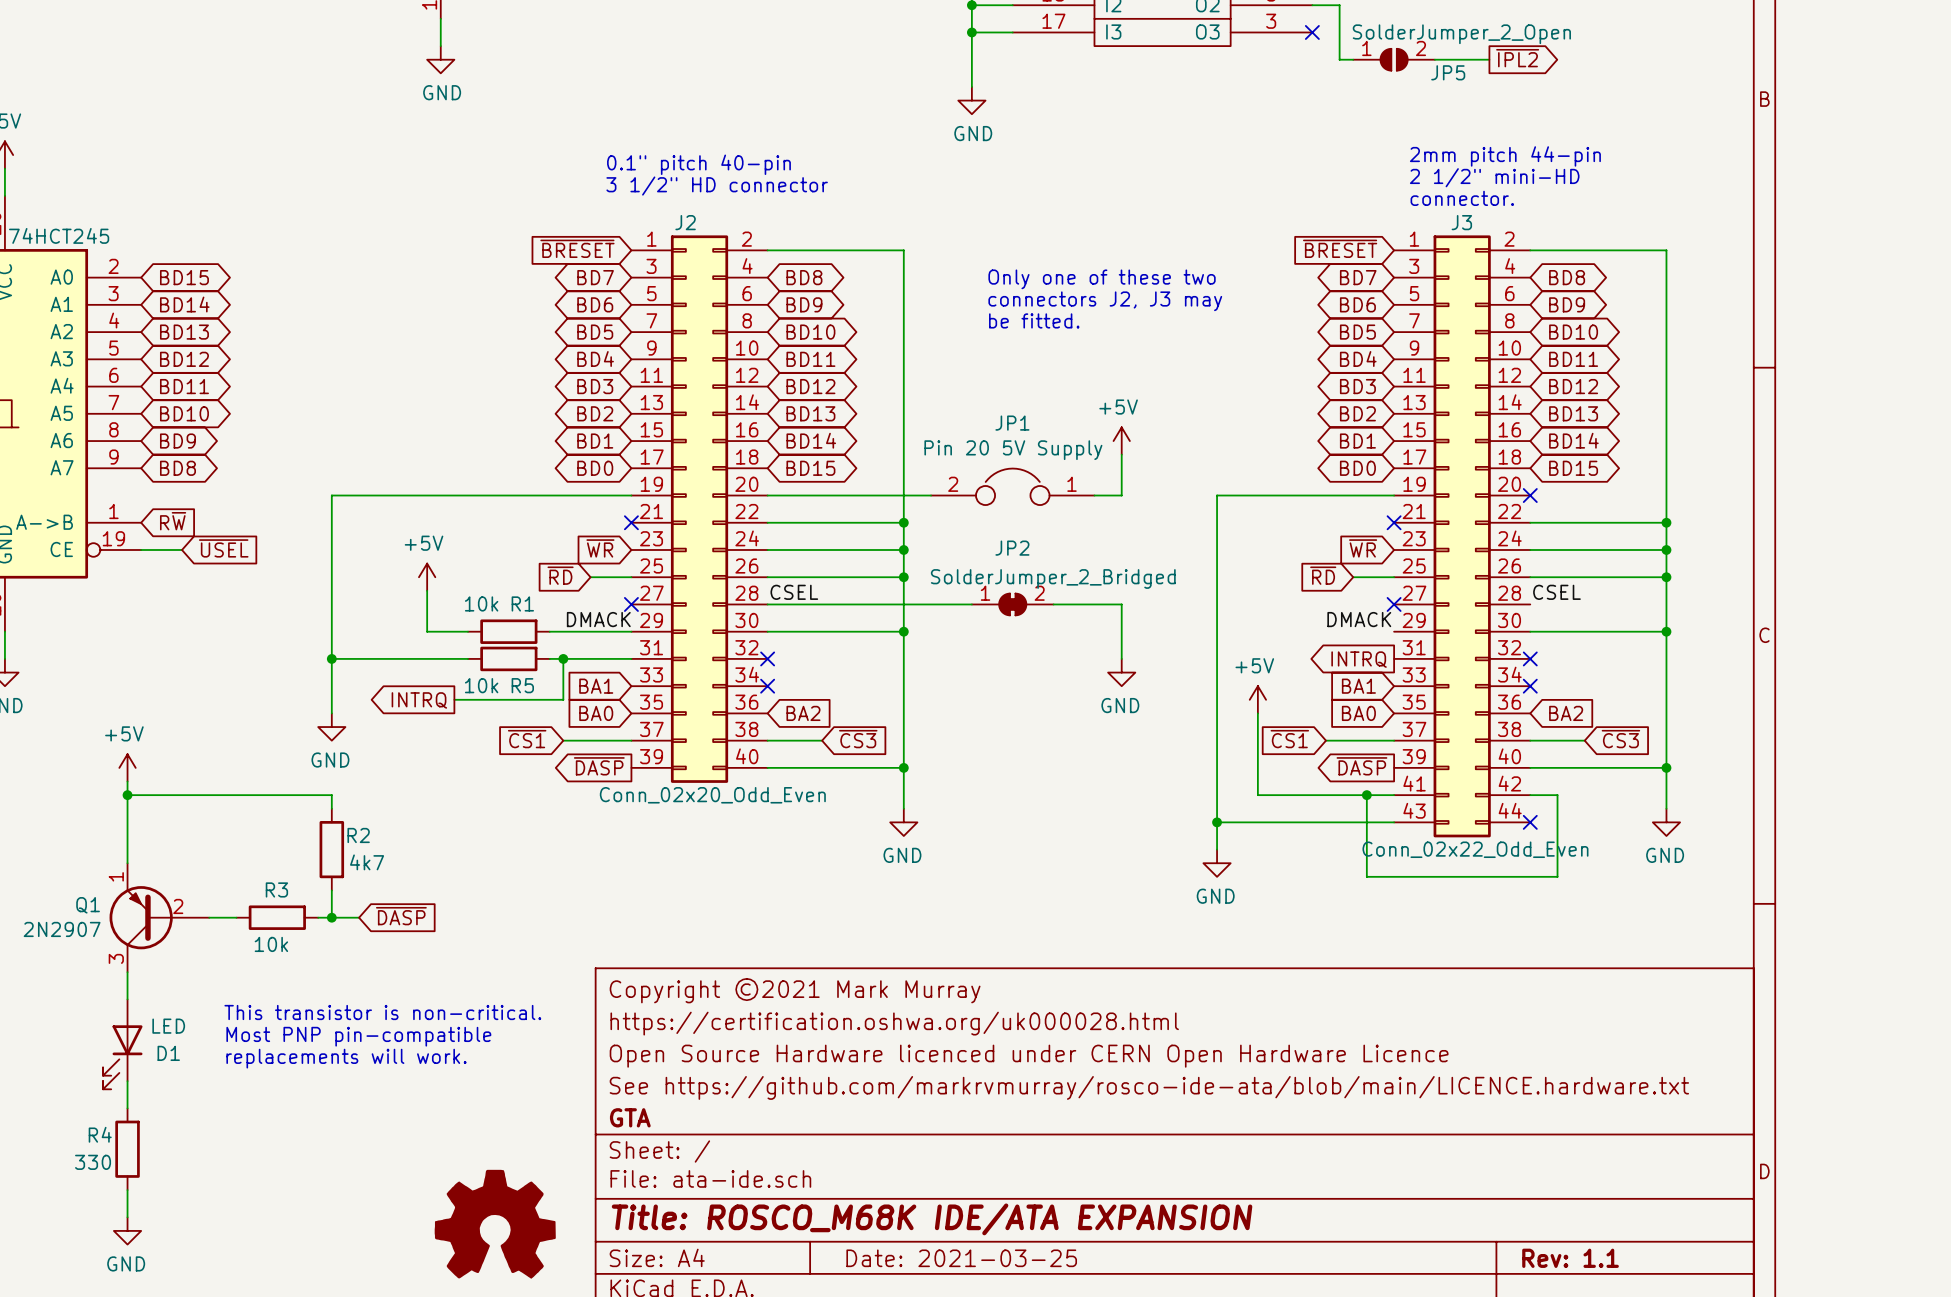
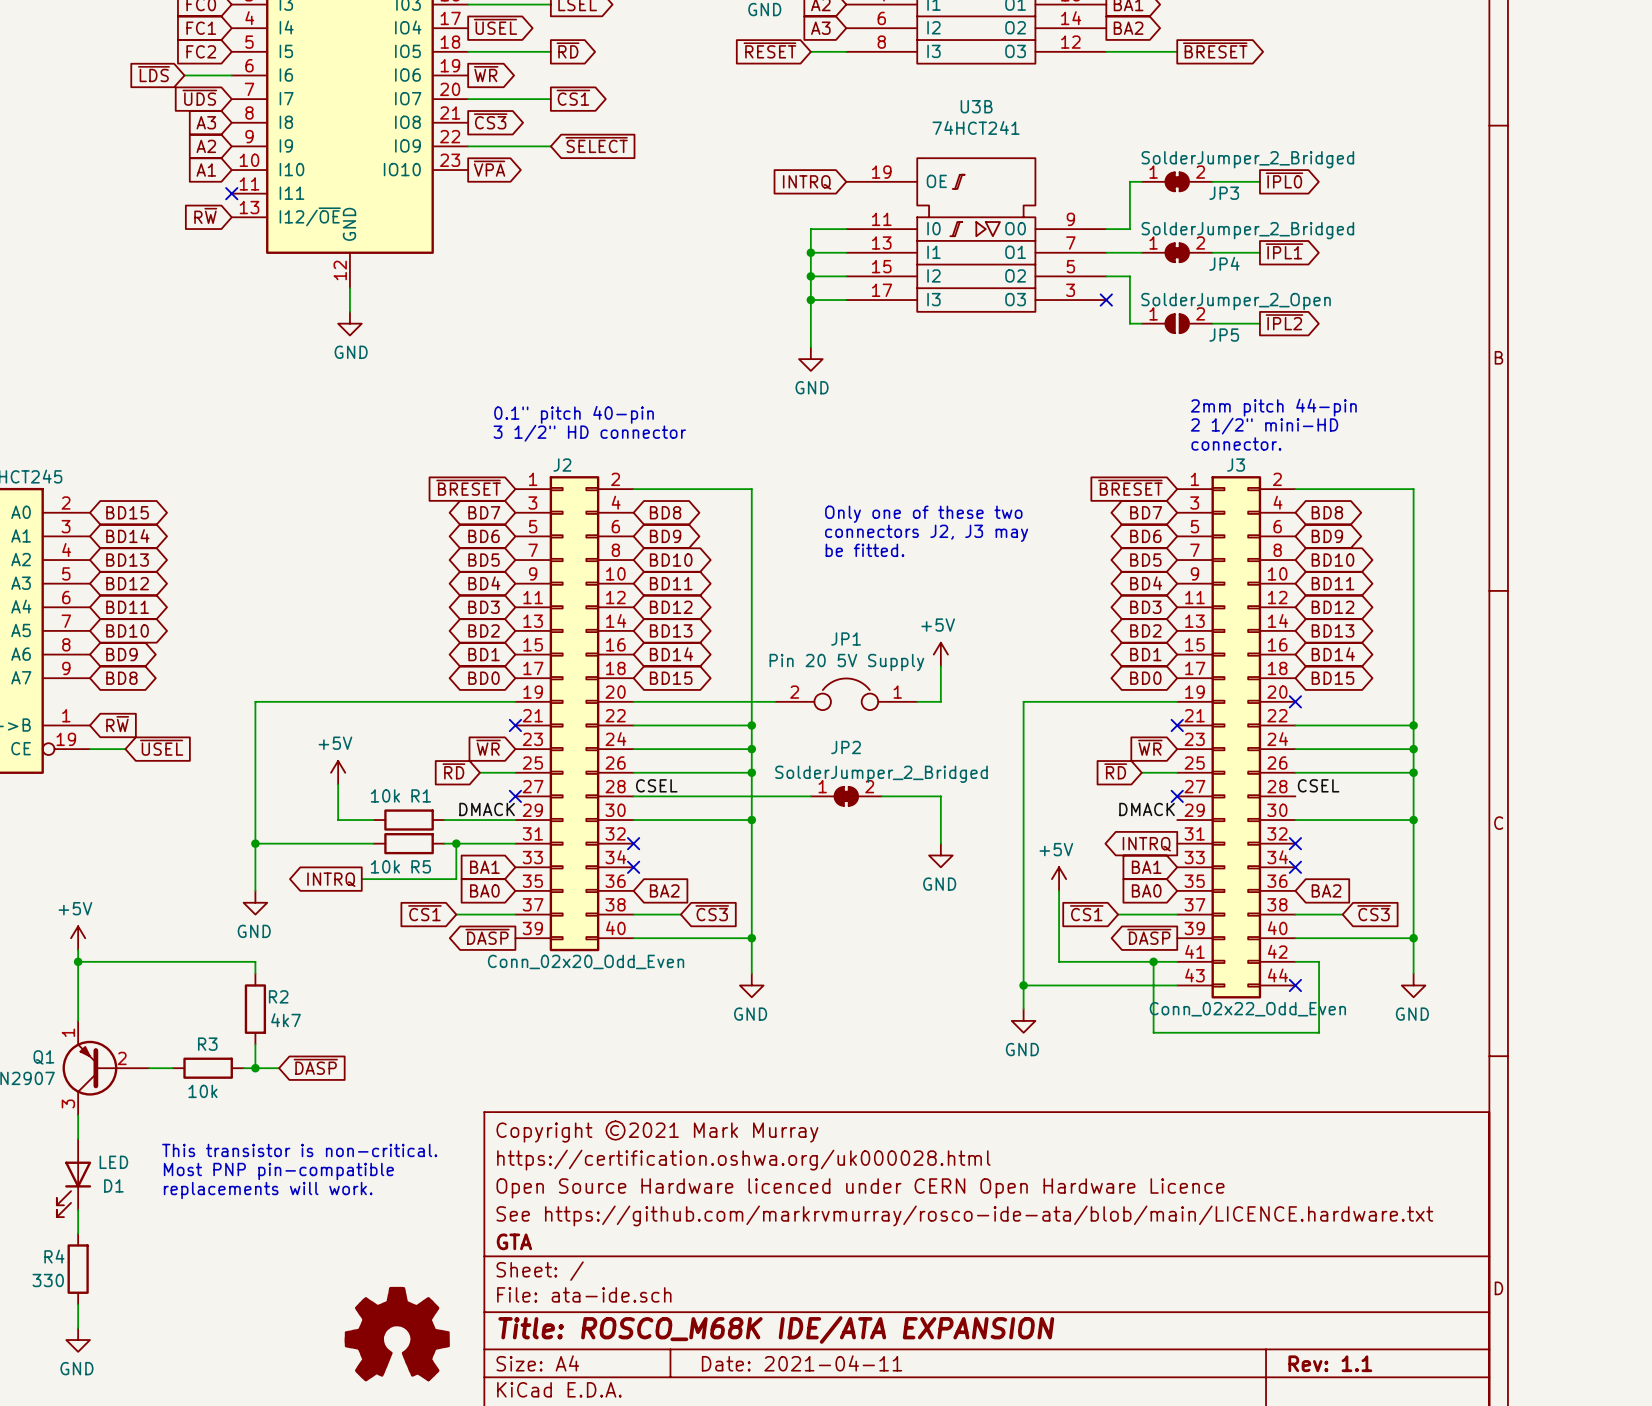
title block: Date: 2021-03-25 (961, 1258) -> Date: 2021-04-11 (802, 1363)

